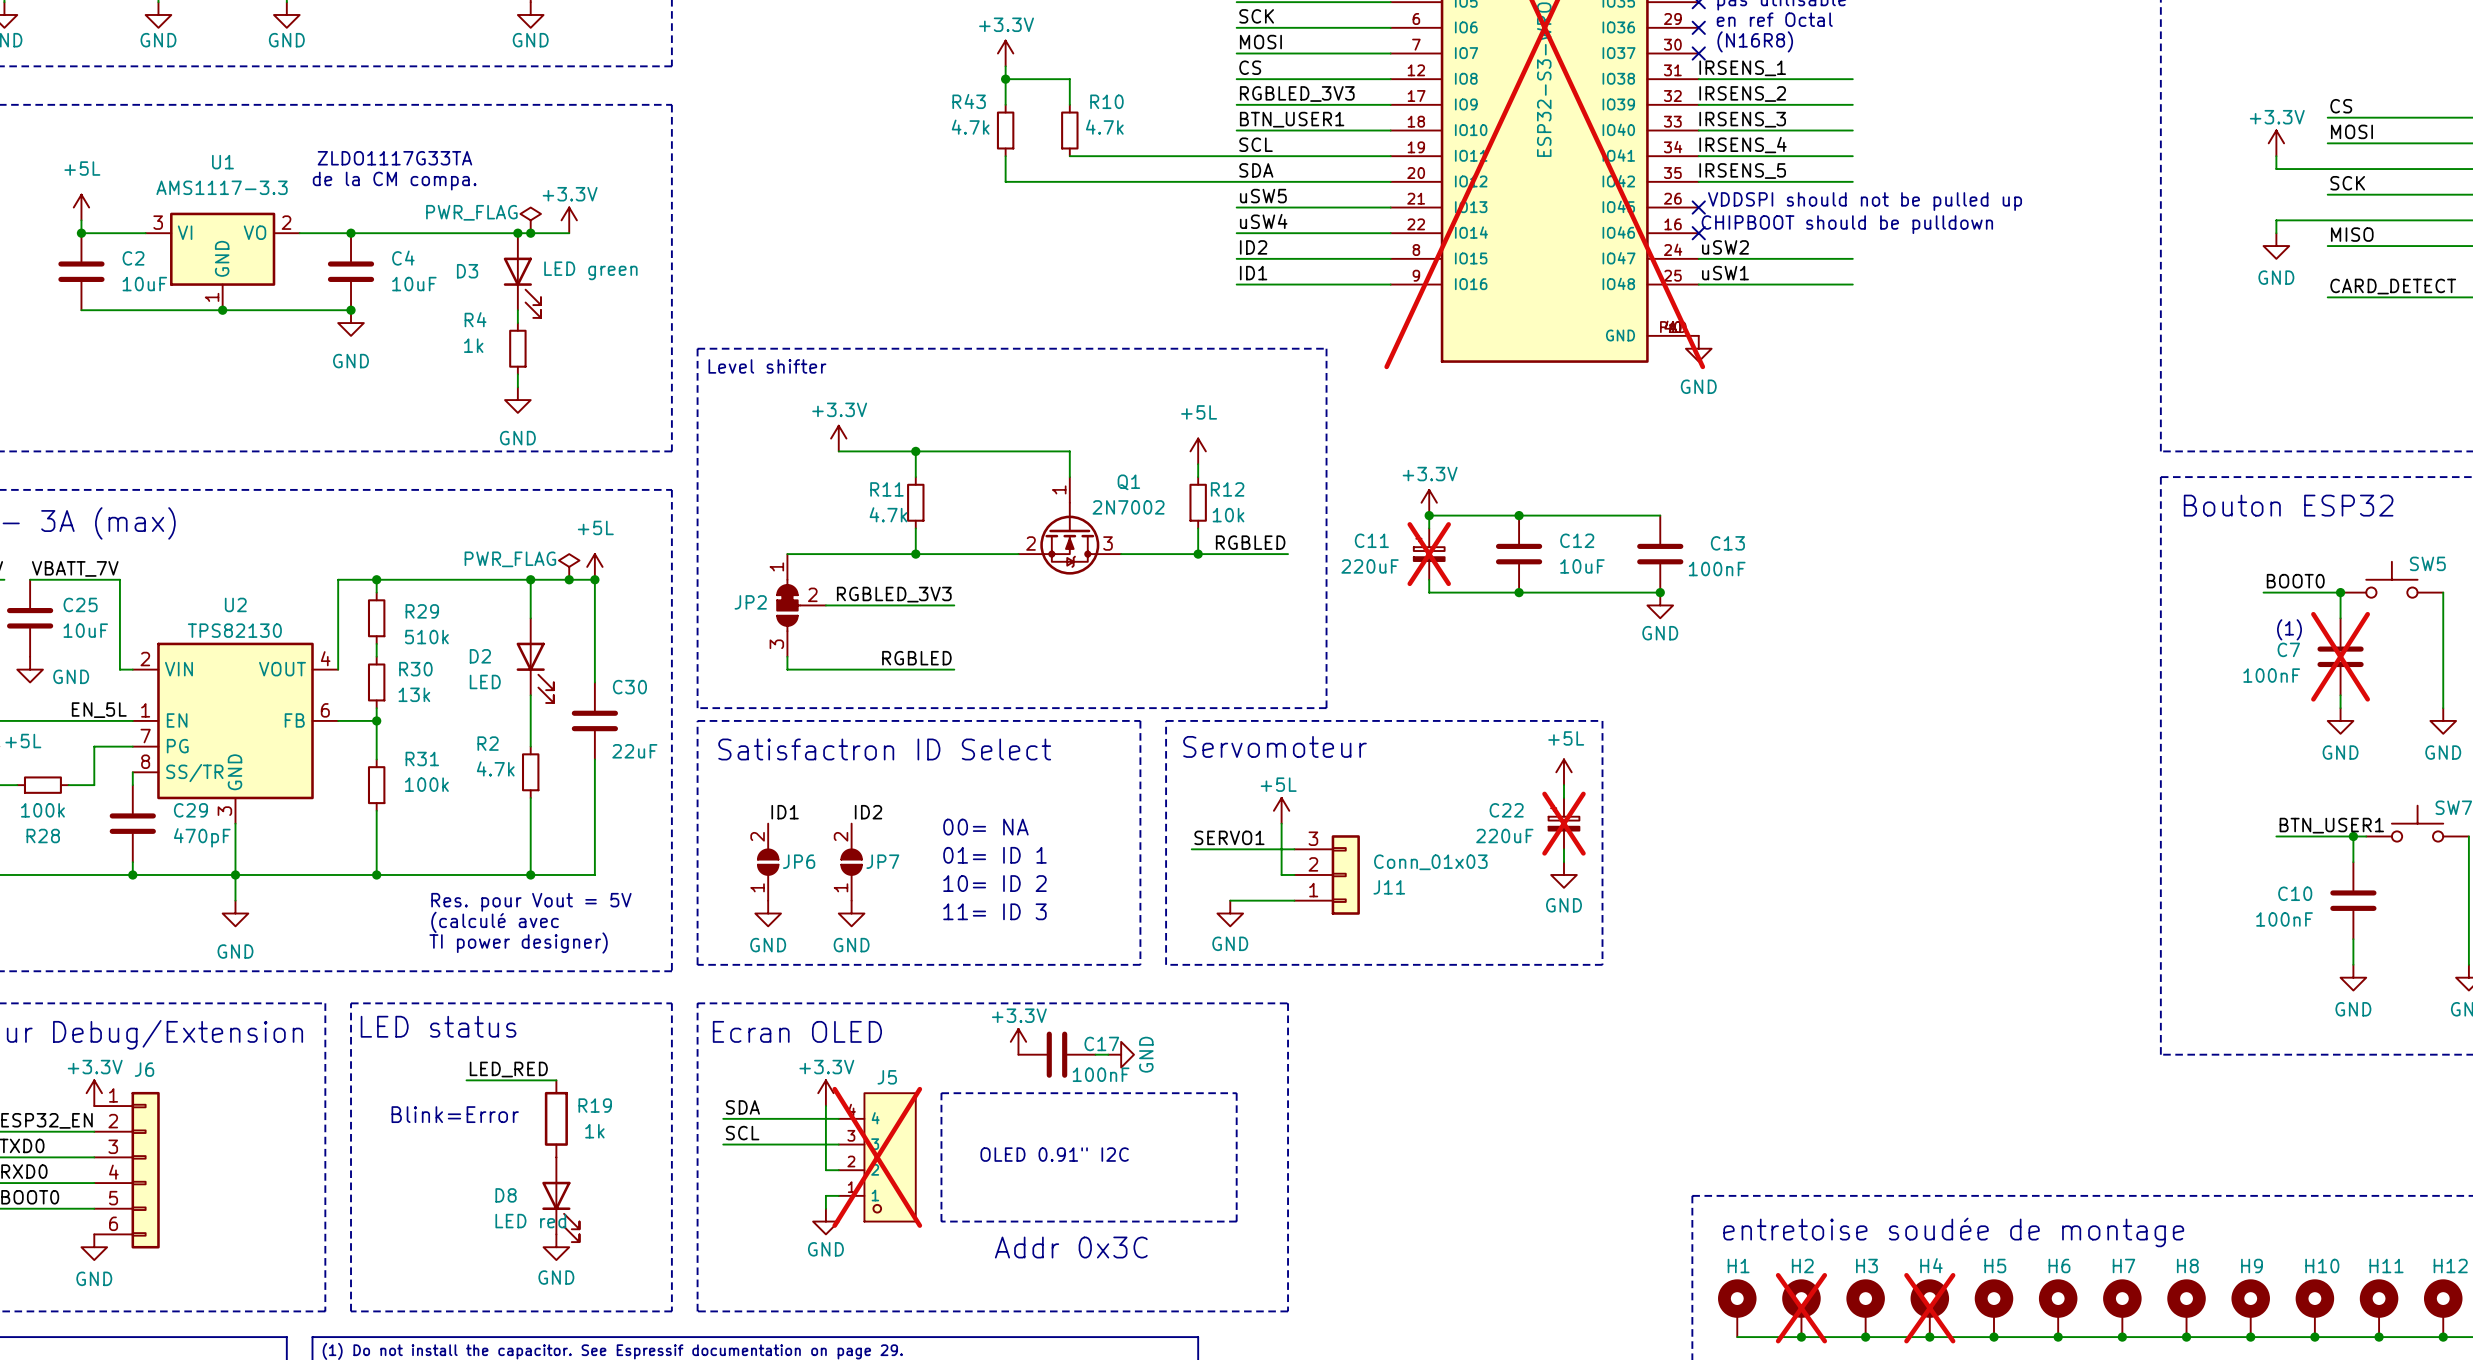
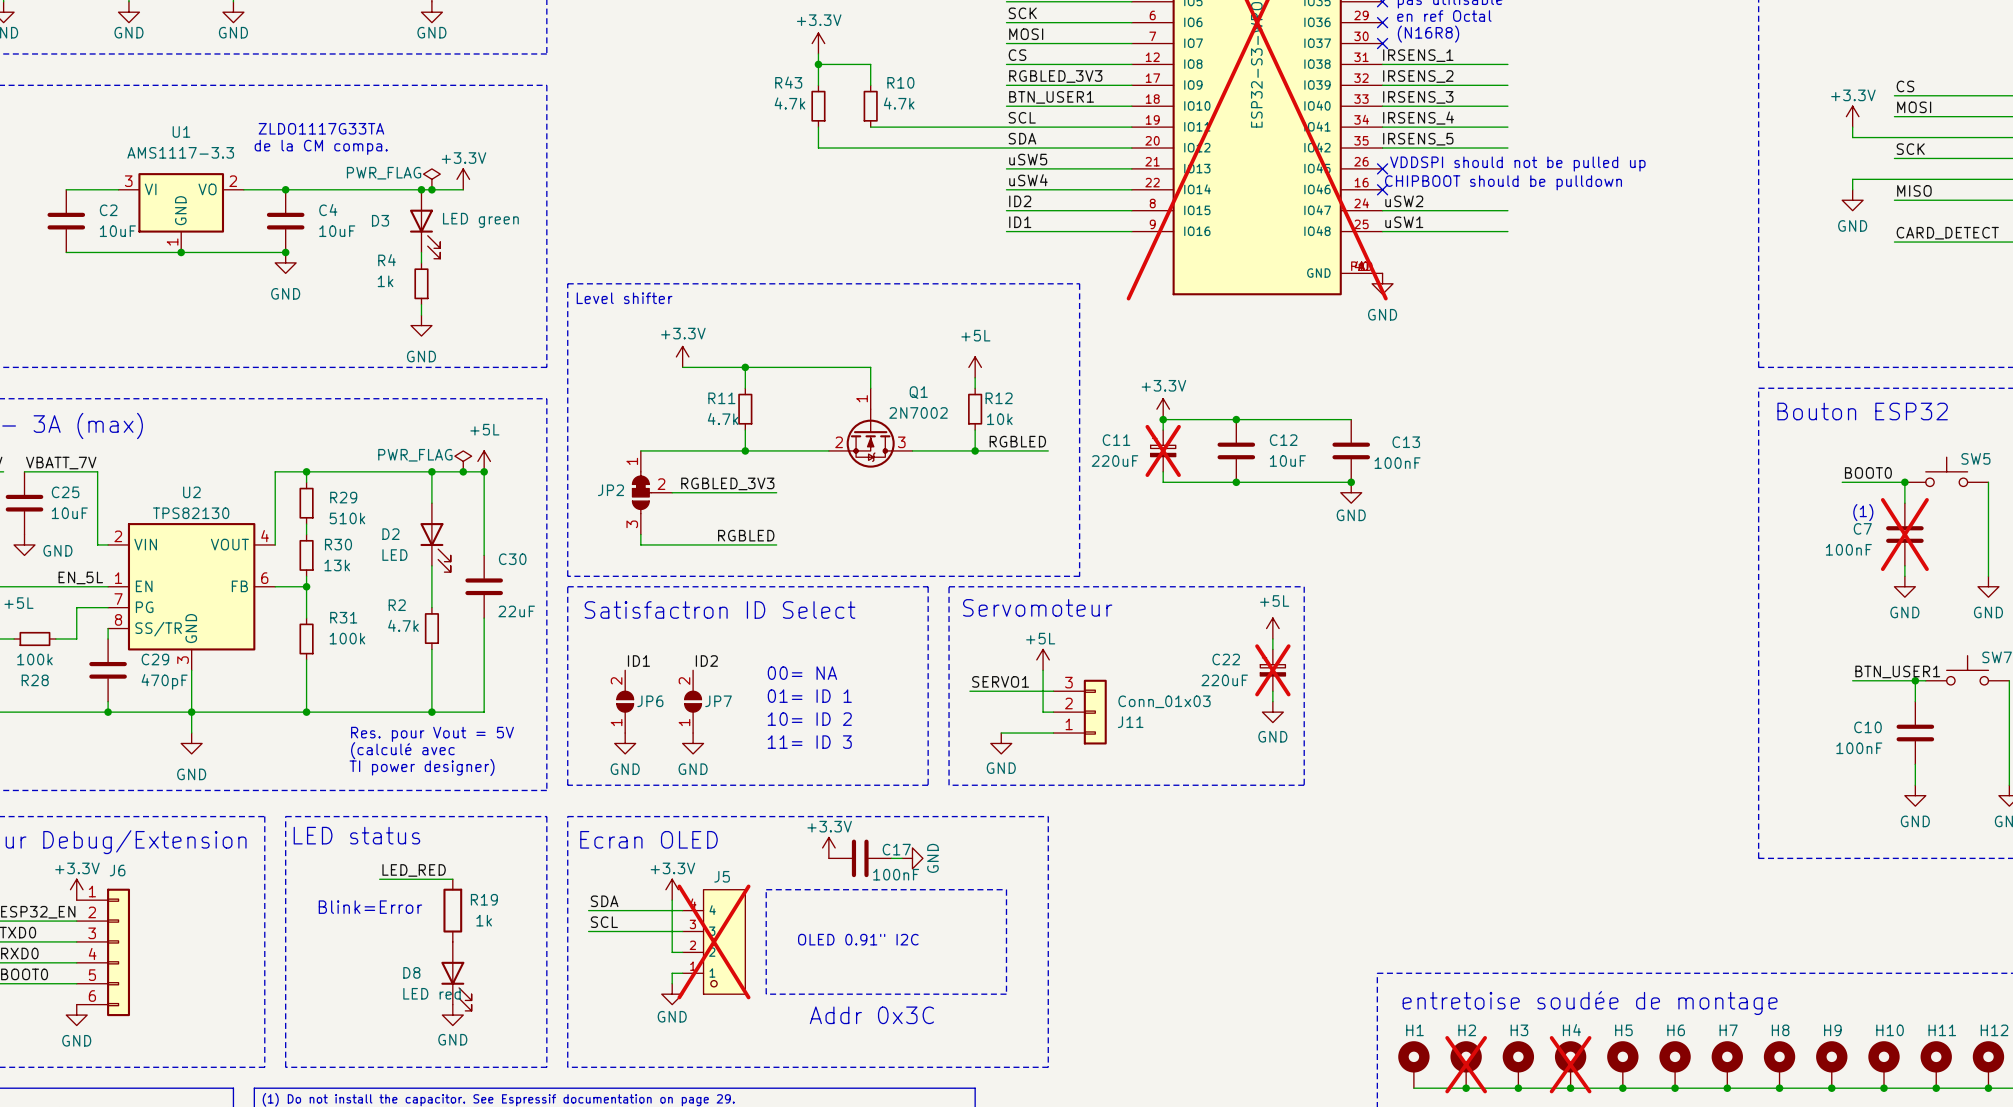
power symbol: +5L (81, 207) -> none
wire: (81, 220) (81, 233) -> none
junction: (81, 233) -> none

